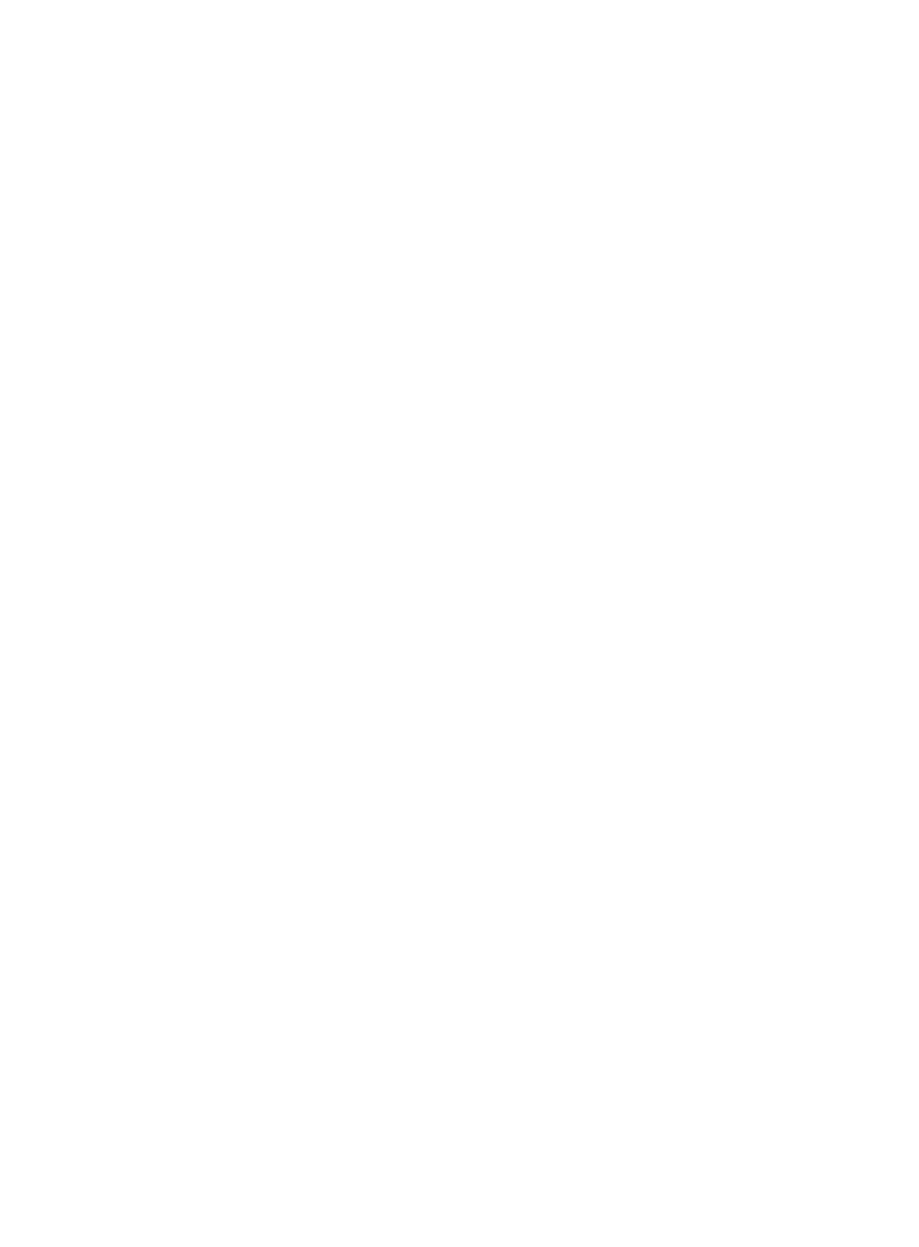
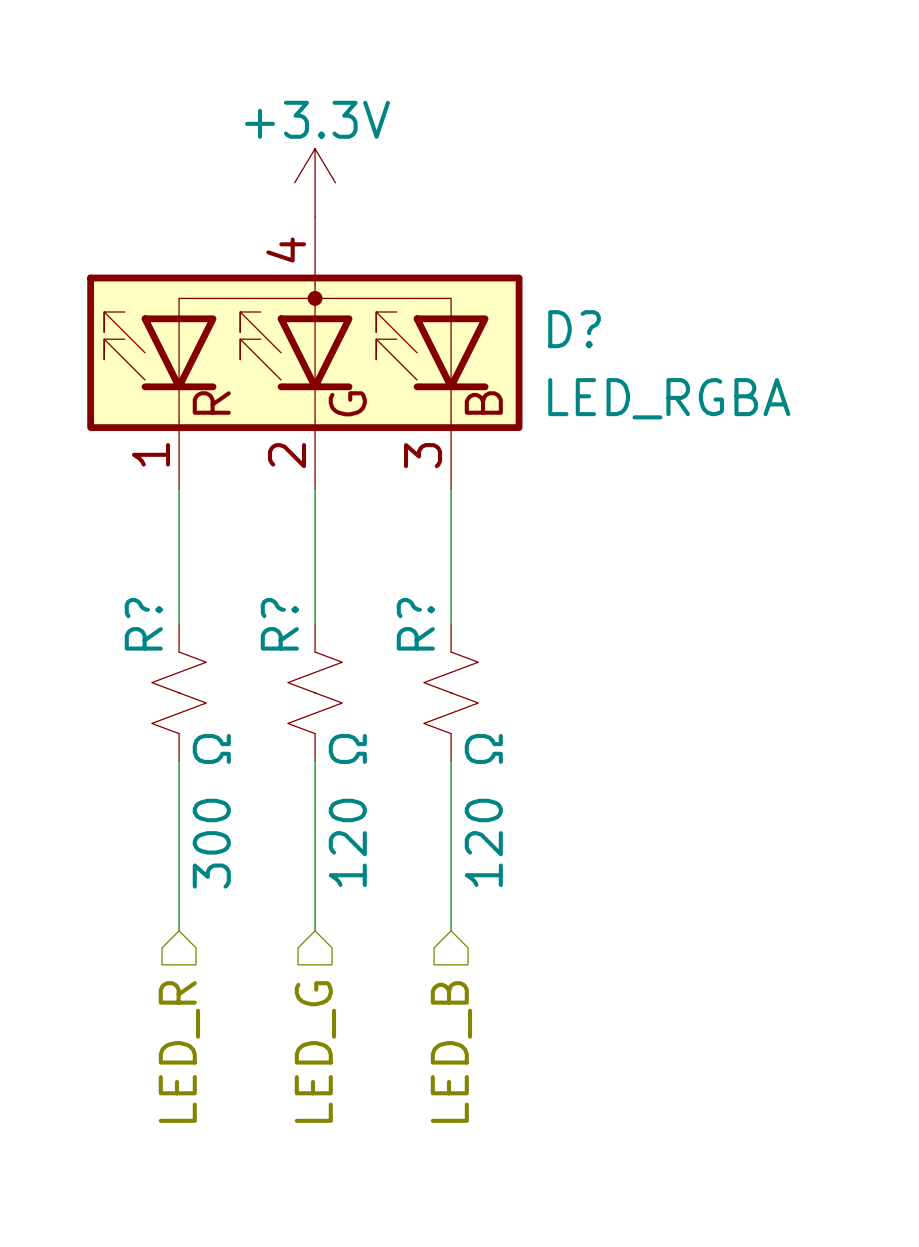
power symbol: none -> +3.3V (315, 182)
D?: none -> LED_RGBA (304, 352)
wire: none -> (179, 488) (179, 624)
wire: none -> (315, 488) (315, 624)
wire: none -> (451, 488) (451, 624)
R?: none -> 300 Ω (179, 692)
R?: none -> 120 Ω (315, 692)
R?: none -> 120 Ω (451, 692)
wire: none -> (179, 760) (179, 930)
wire: none -> (315, 760) (315, 930)
wire: none -> (451, 760) (451, 930)
hierarchical label: none -> LED_R (179, 1052)
hierarchical label: none -> LED_G (315, 1052)
hierarchical label: none -> LED_B (451, 1052)

